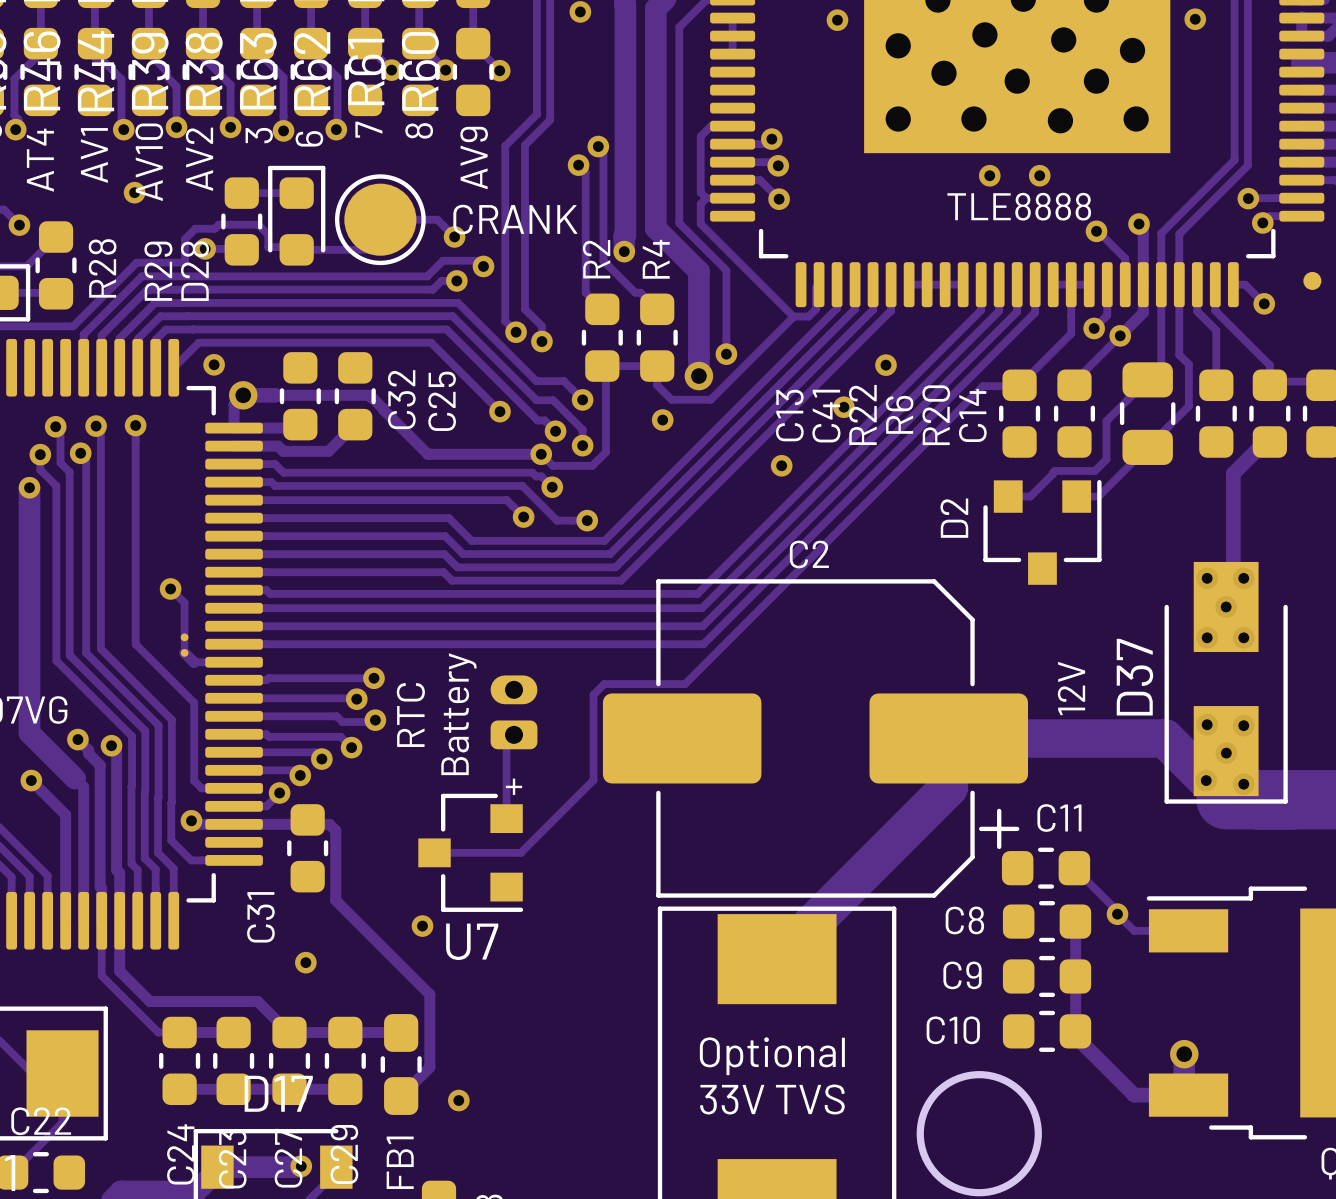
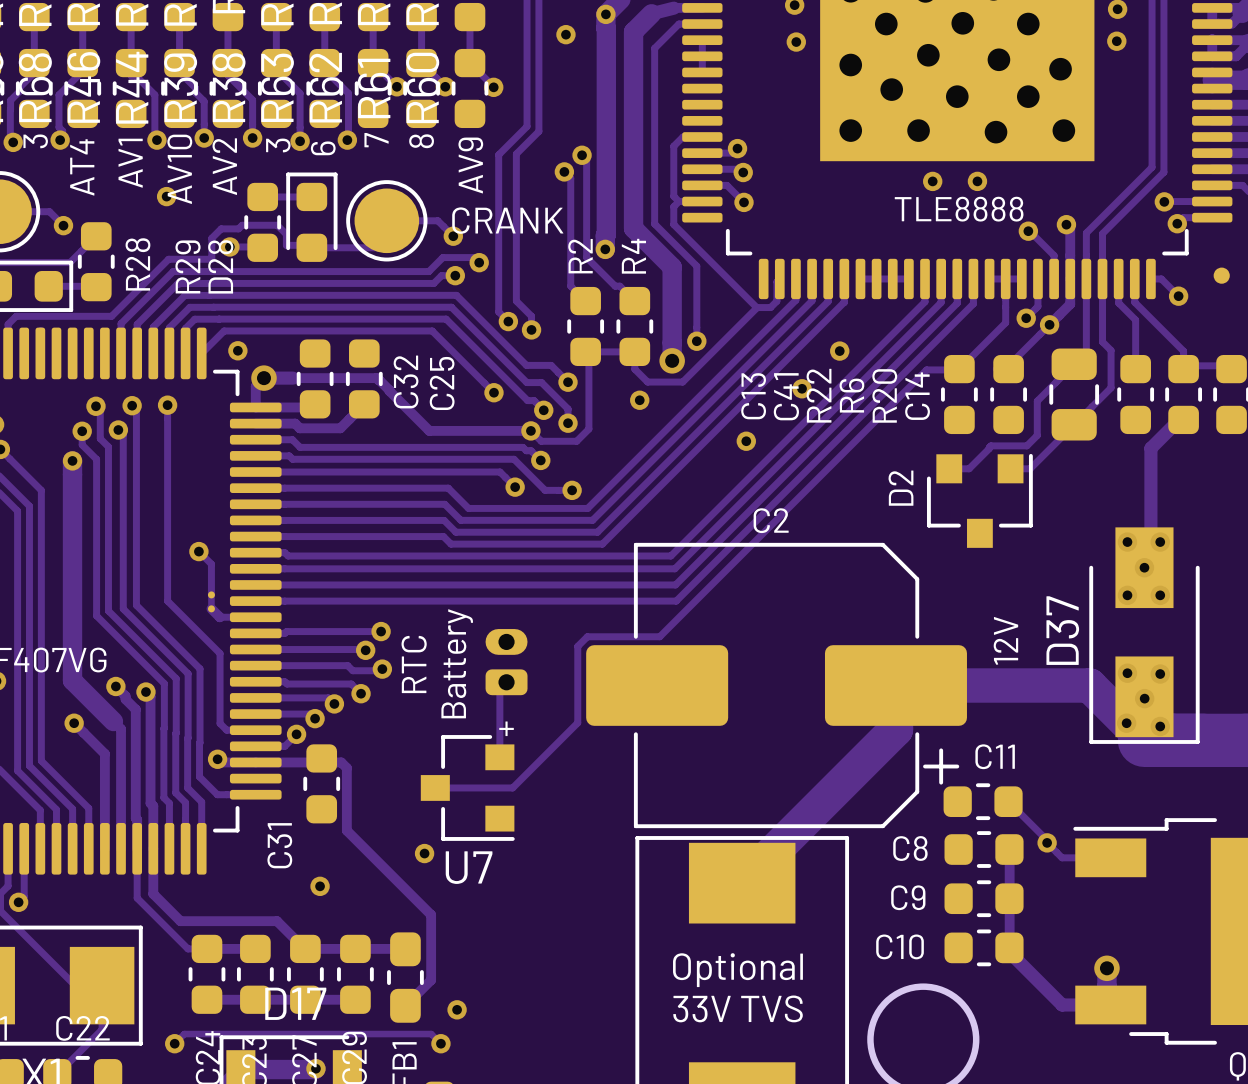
track: none -> (174, 1043) (184, 1034) (431, 1034) (440, 1043)
via: none -> (174, 1043)
via: none -> (440, 1043)

